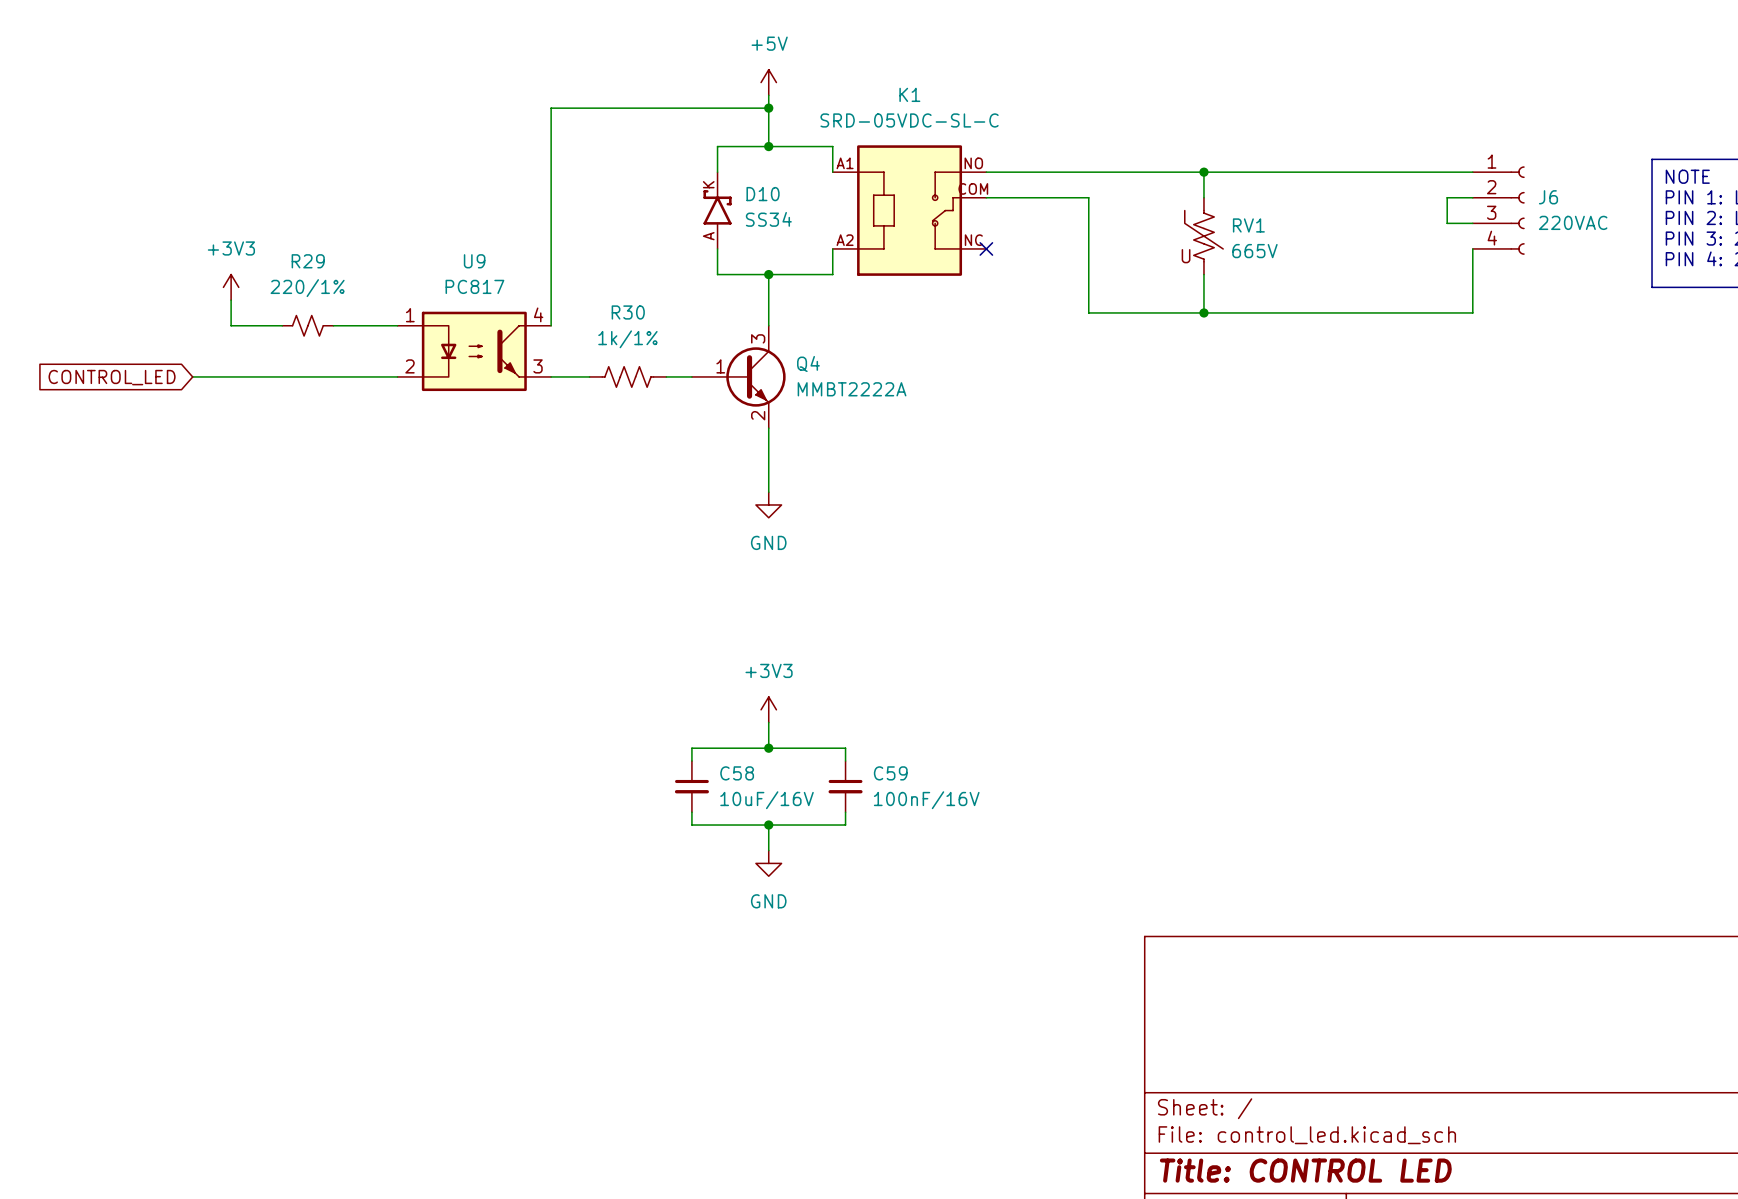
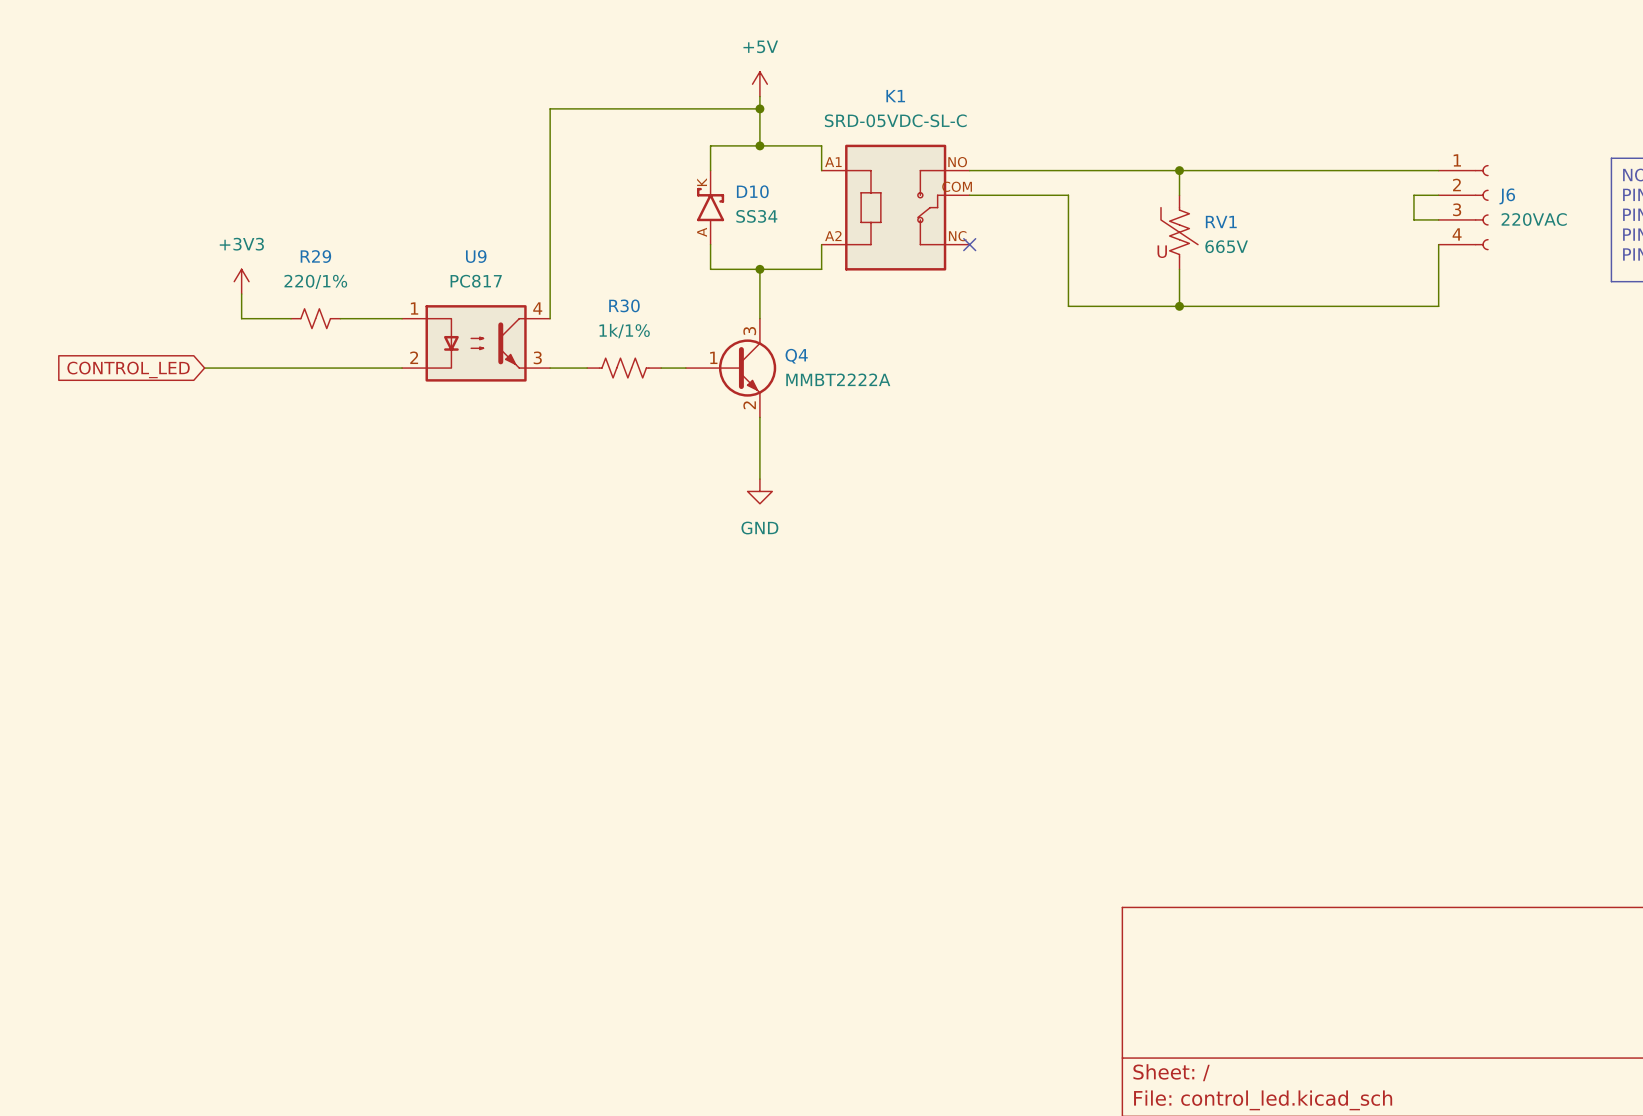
power symbol: +3V3 (768, 709) -> none
wire: (768, 722) (768, 748) -> none
junction: (768, 748) -> none
wire: (691, 761) (691, 748) (845, 748) (845, 761) -> none
C58: 10uF/16V (691, 786) -> none
C59: 100nF/16V (845, 786) -> none
wire: (691, 812) (691, 825) (845, 825) (845, 812) -> none
wire: (768, 825) (768, 850) -> none
junction: (768, 825) -> none
power symbol: GND (768, 863) -> none

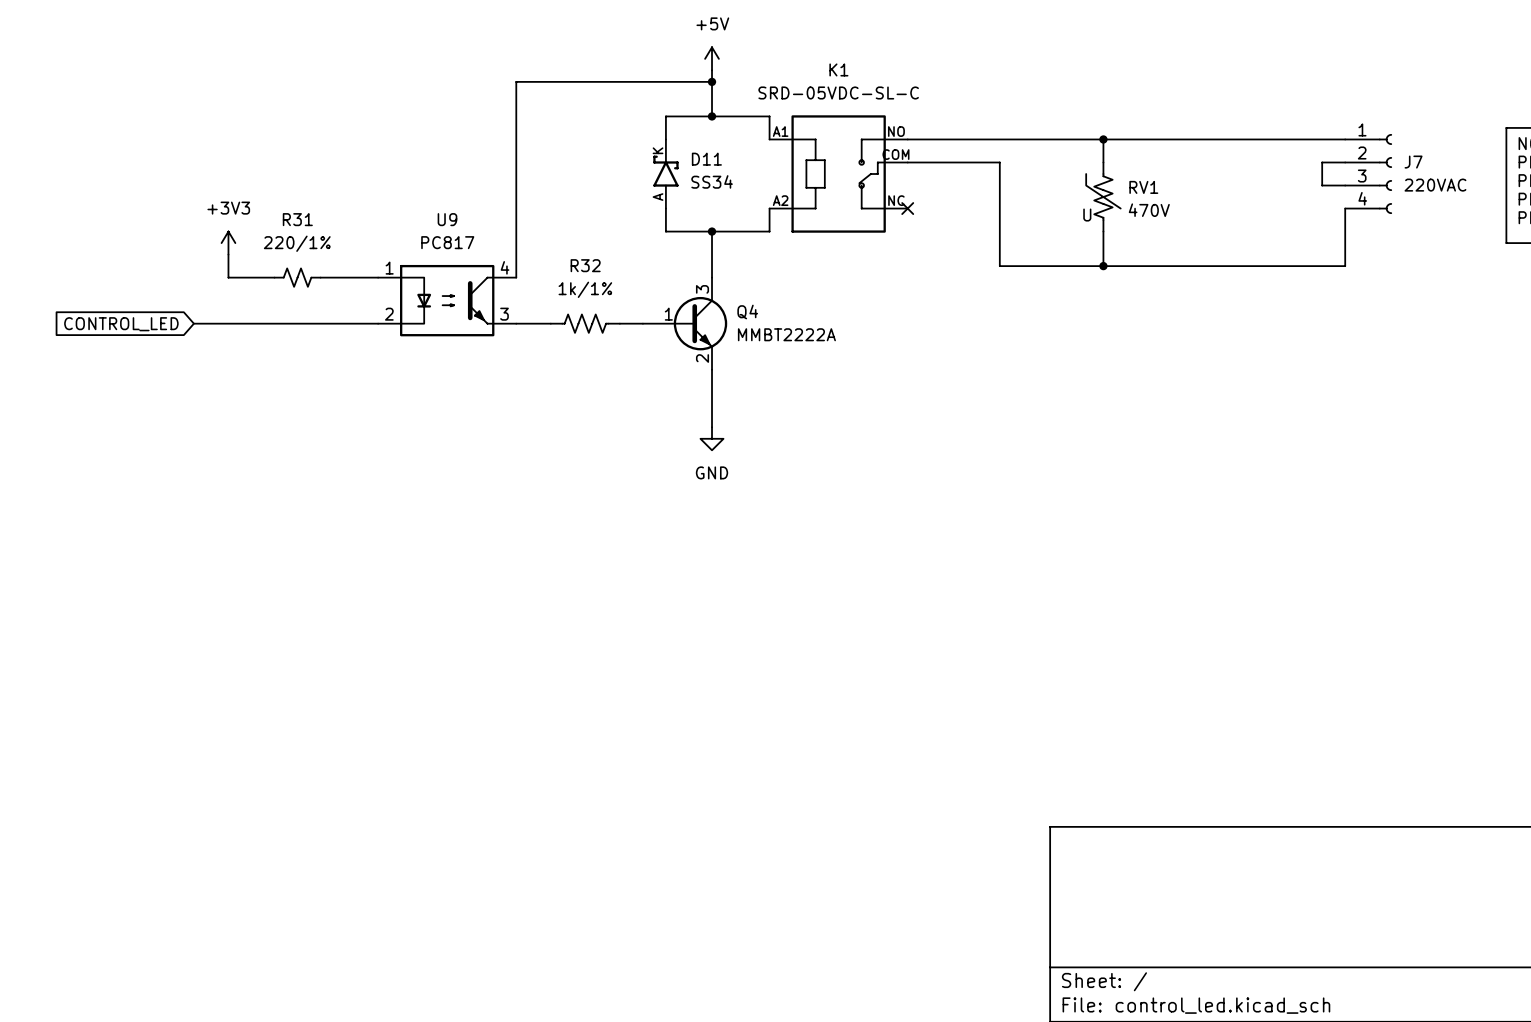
D10 name: D10 (752, 191) -> D11 (706, 159)
J6 name: J6 (1507, 196) -> J7 (1413, 162)
RV1 value: 665V (1226, 246) -> 470V (1149, 210)
R29 name: R29 (315, 256) -> R31 (297, 219)
R30 name: R30 (624, 305) -> R32 (585, 265)

